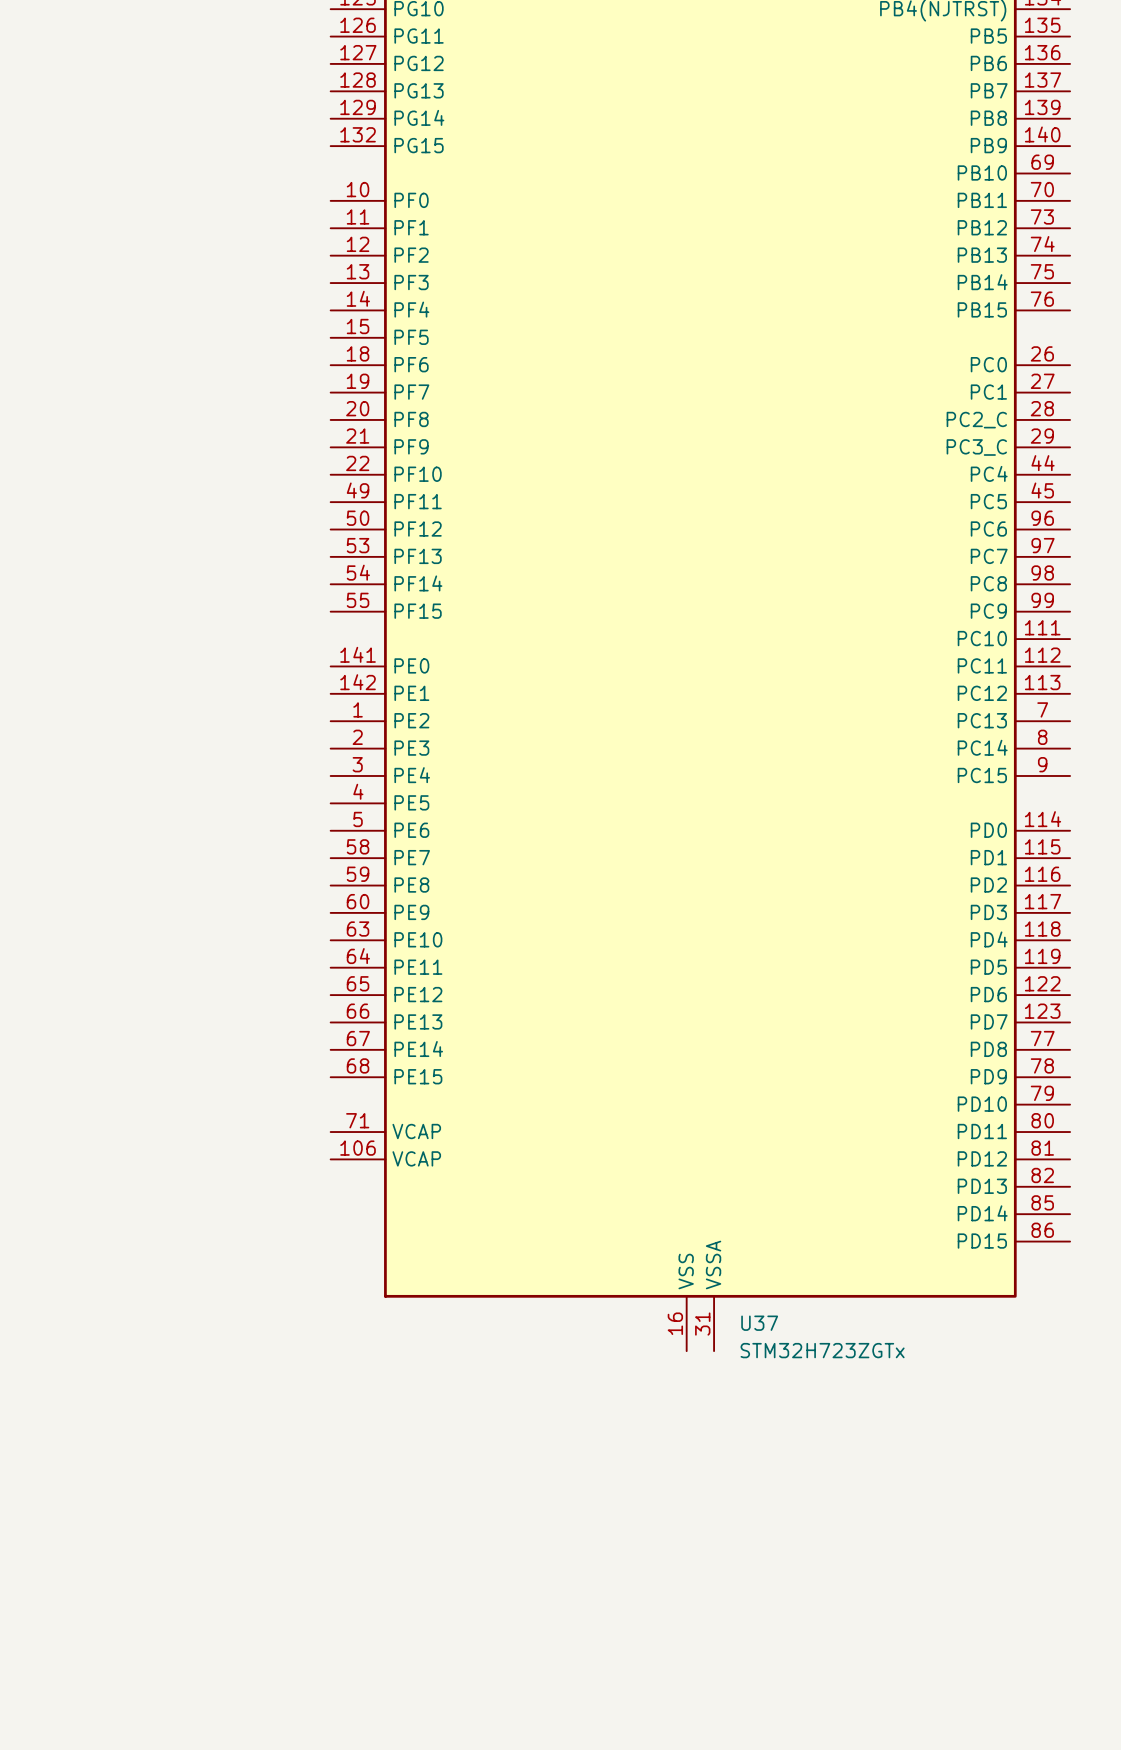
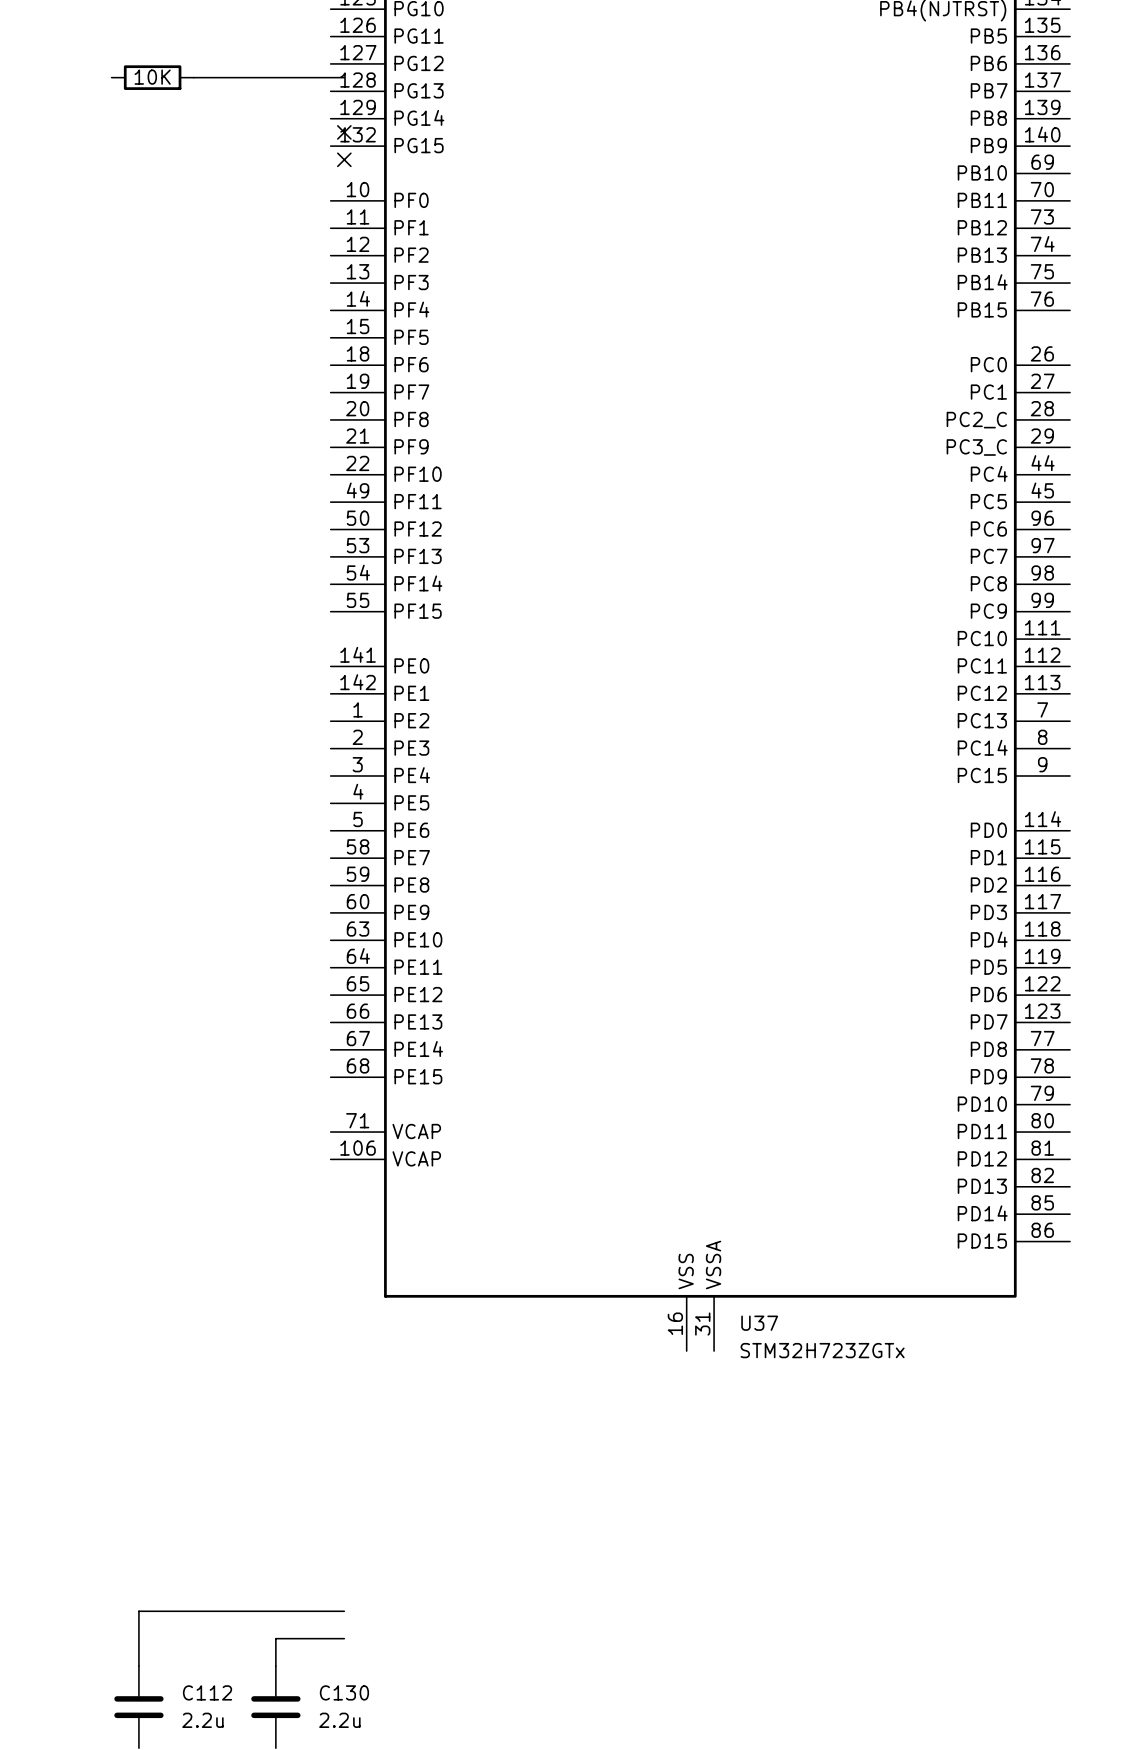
part: none -> 10K (152, 77)
wire: none -> (193, 77) (344, 77)
no-connect mark: none -> (344, 132)
no-connect mark: none -> (344, 159)
wire: none -> (344, 1611) (138, 1611) (138, 1666)
wire: none -> (344, 1638) (275, 1638) (275, 1666)
C112: none -> 2.2u (138, 1707)
C130: none -> 2.2u (275, 1707)

